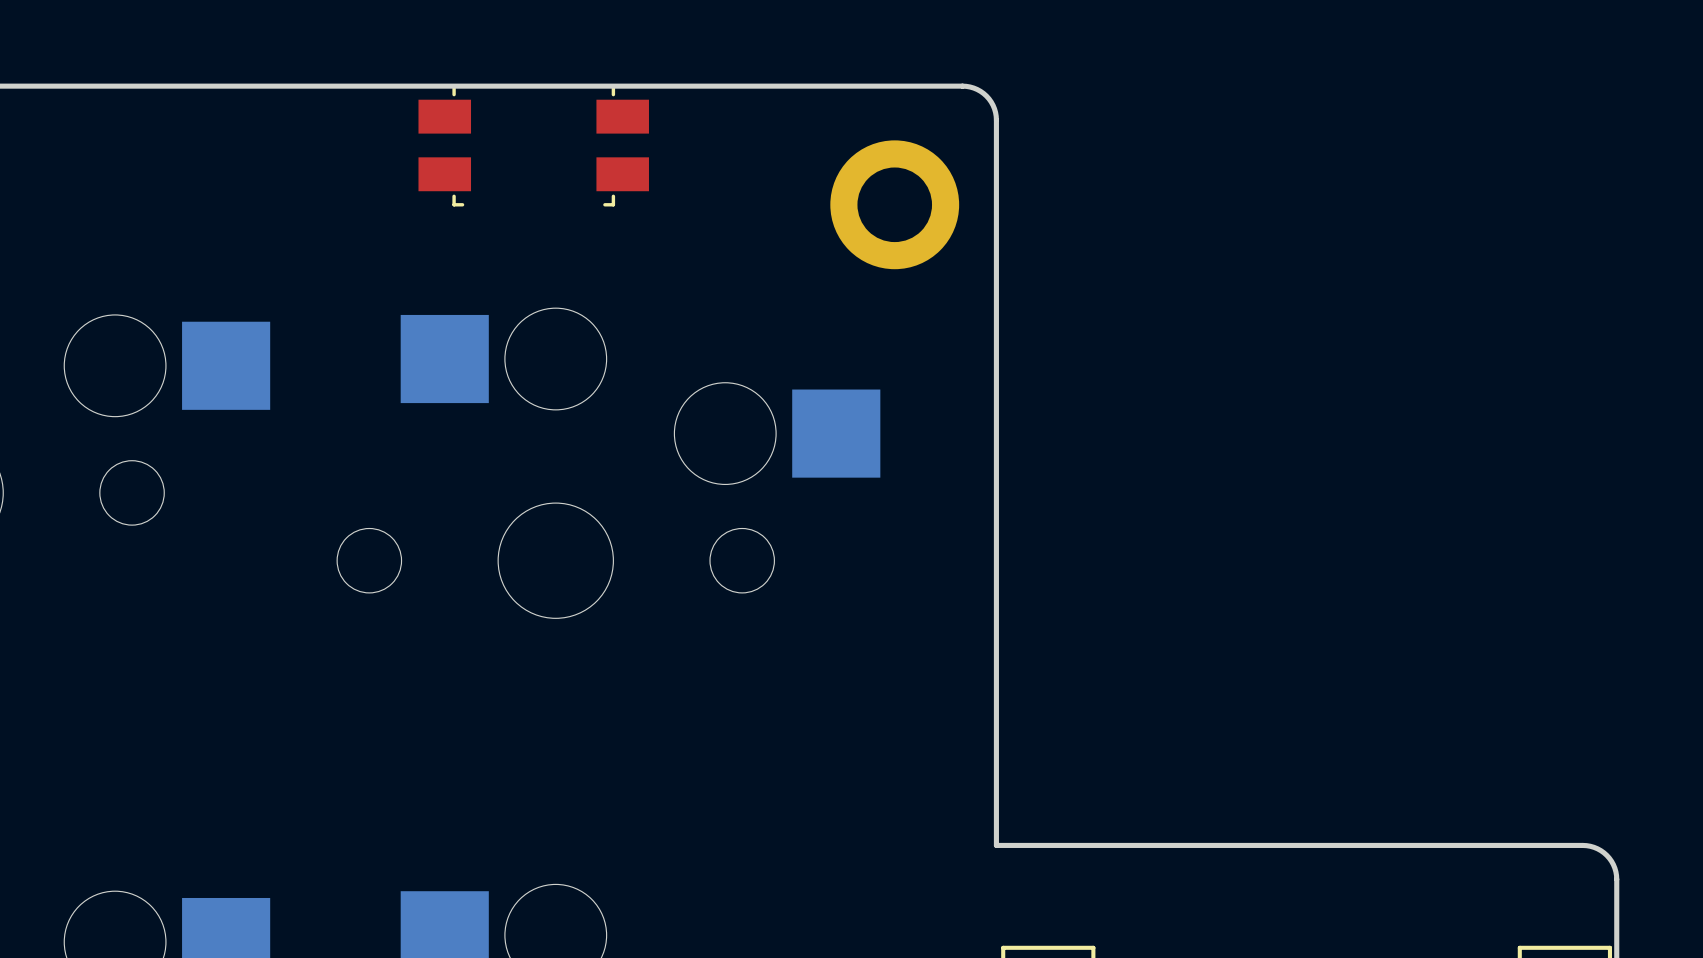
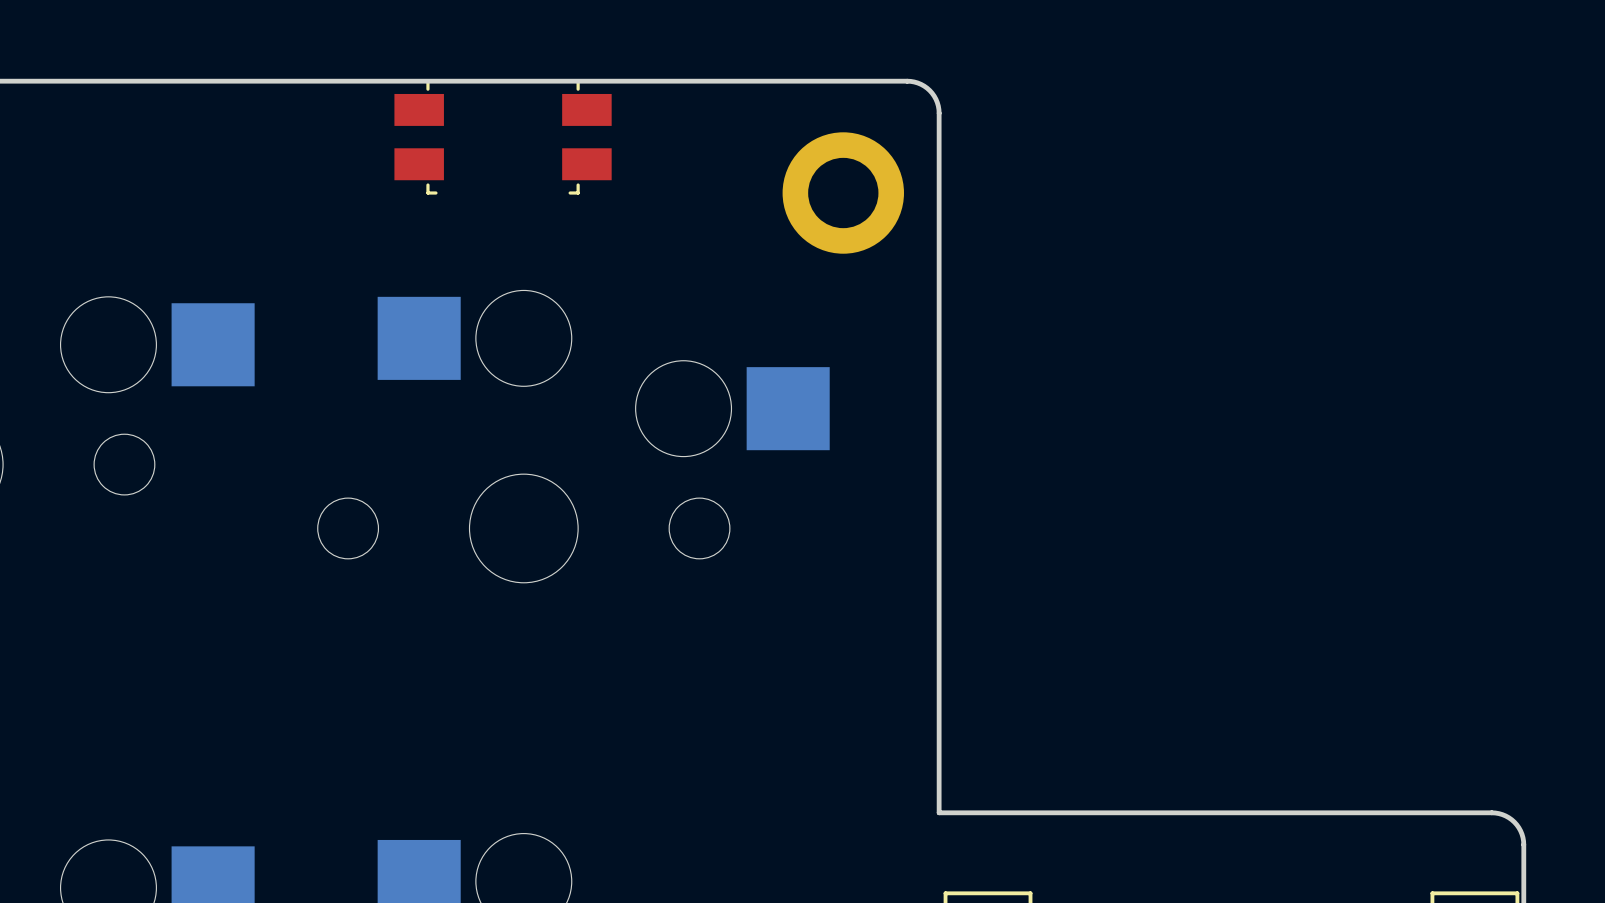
board edge: (996, 845) (1586, 845) (1600, 850) (1611, 861) (1616, 875) (1616, 896) -> (939, 796) (939, 812) (1495, 813) (1508, 817) (1516, 824) (1522, 834) (1523, 844)

